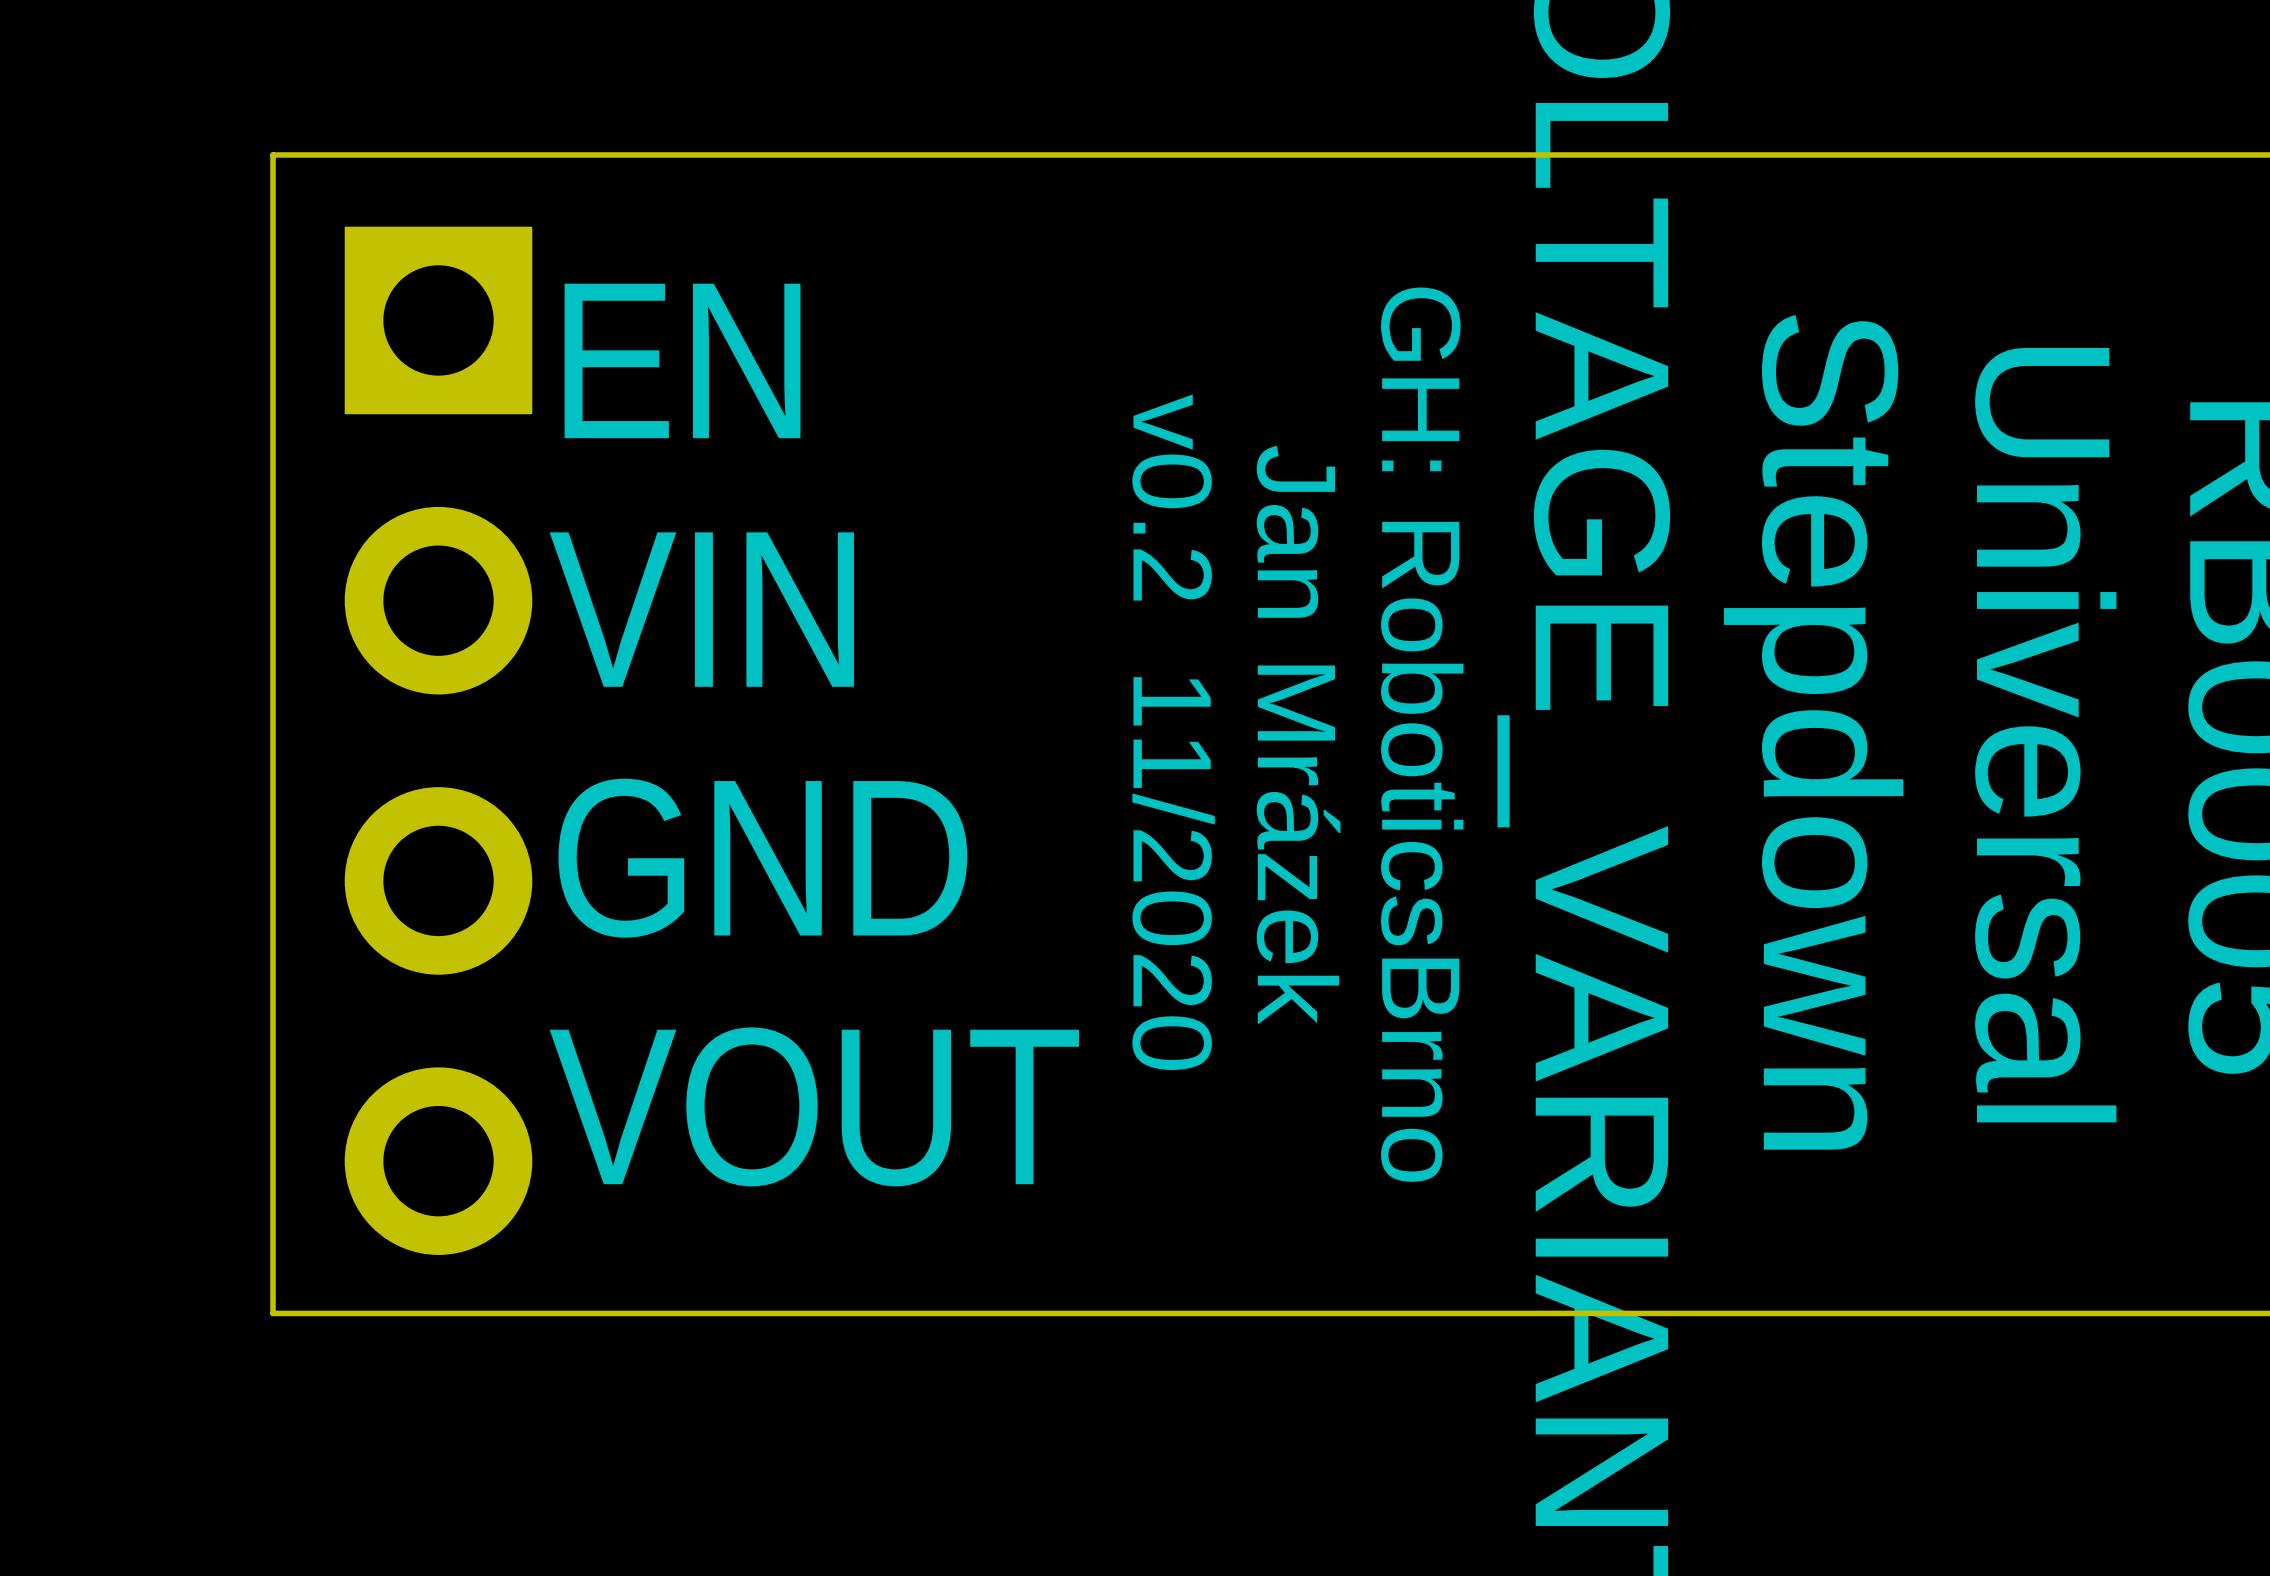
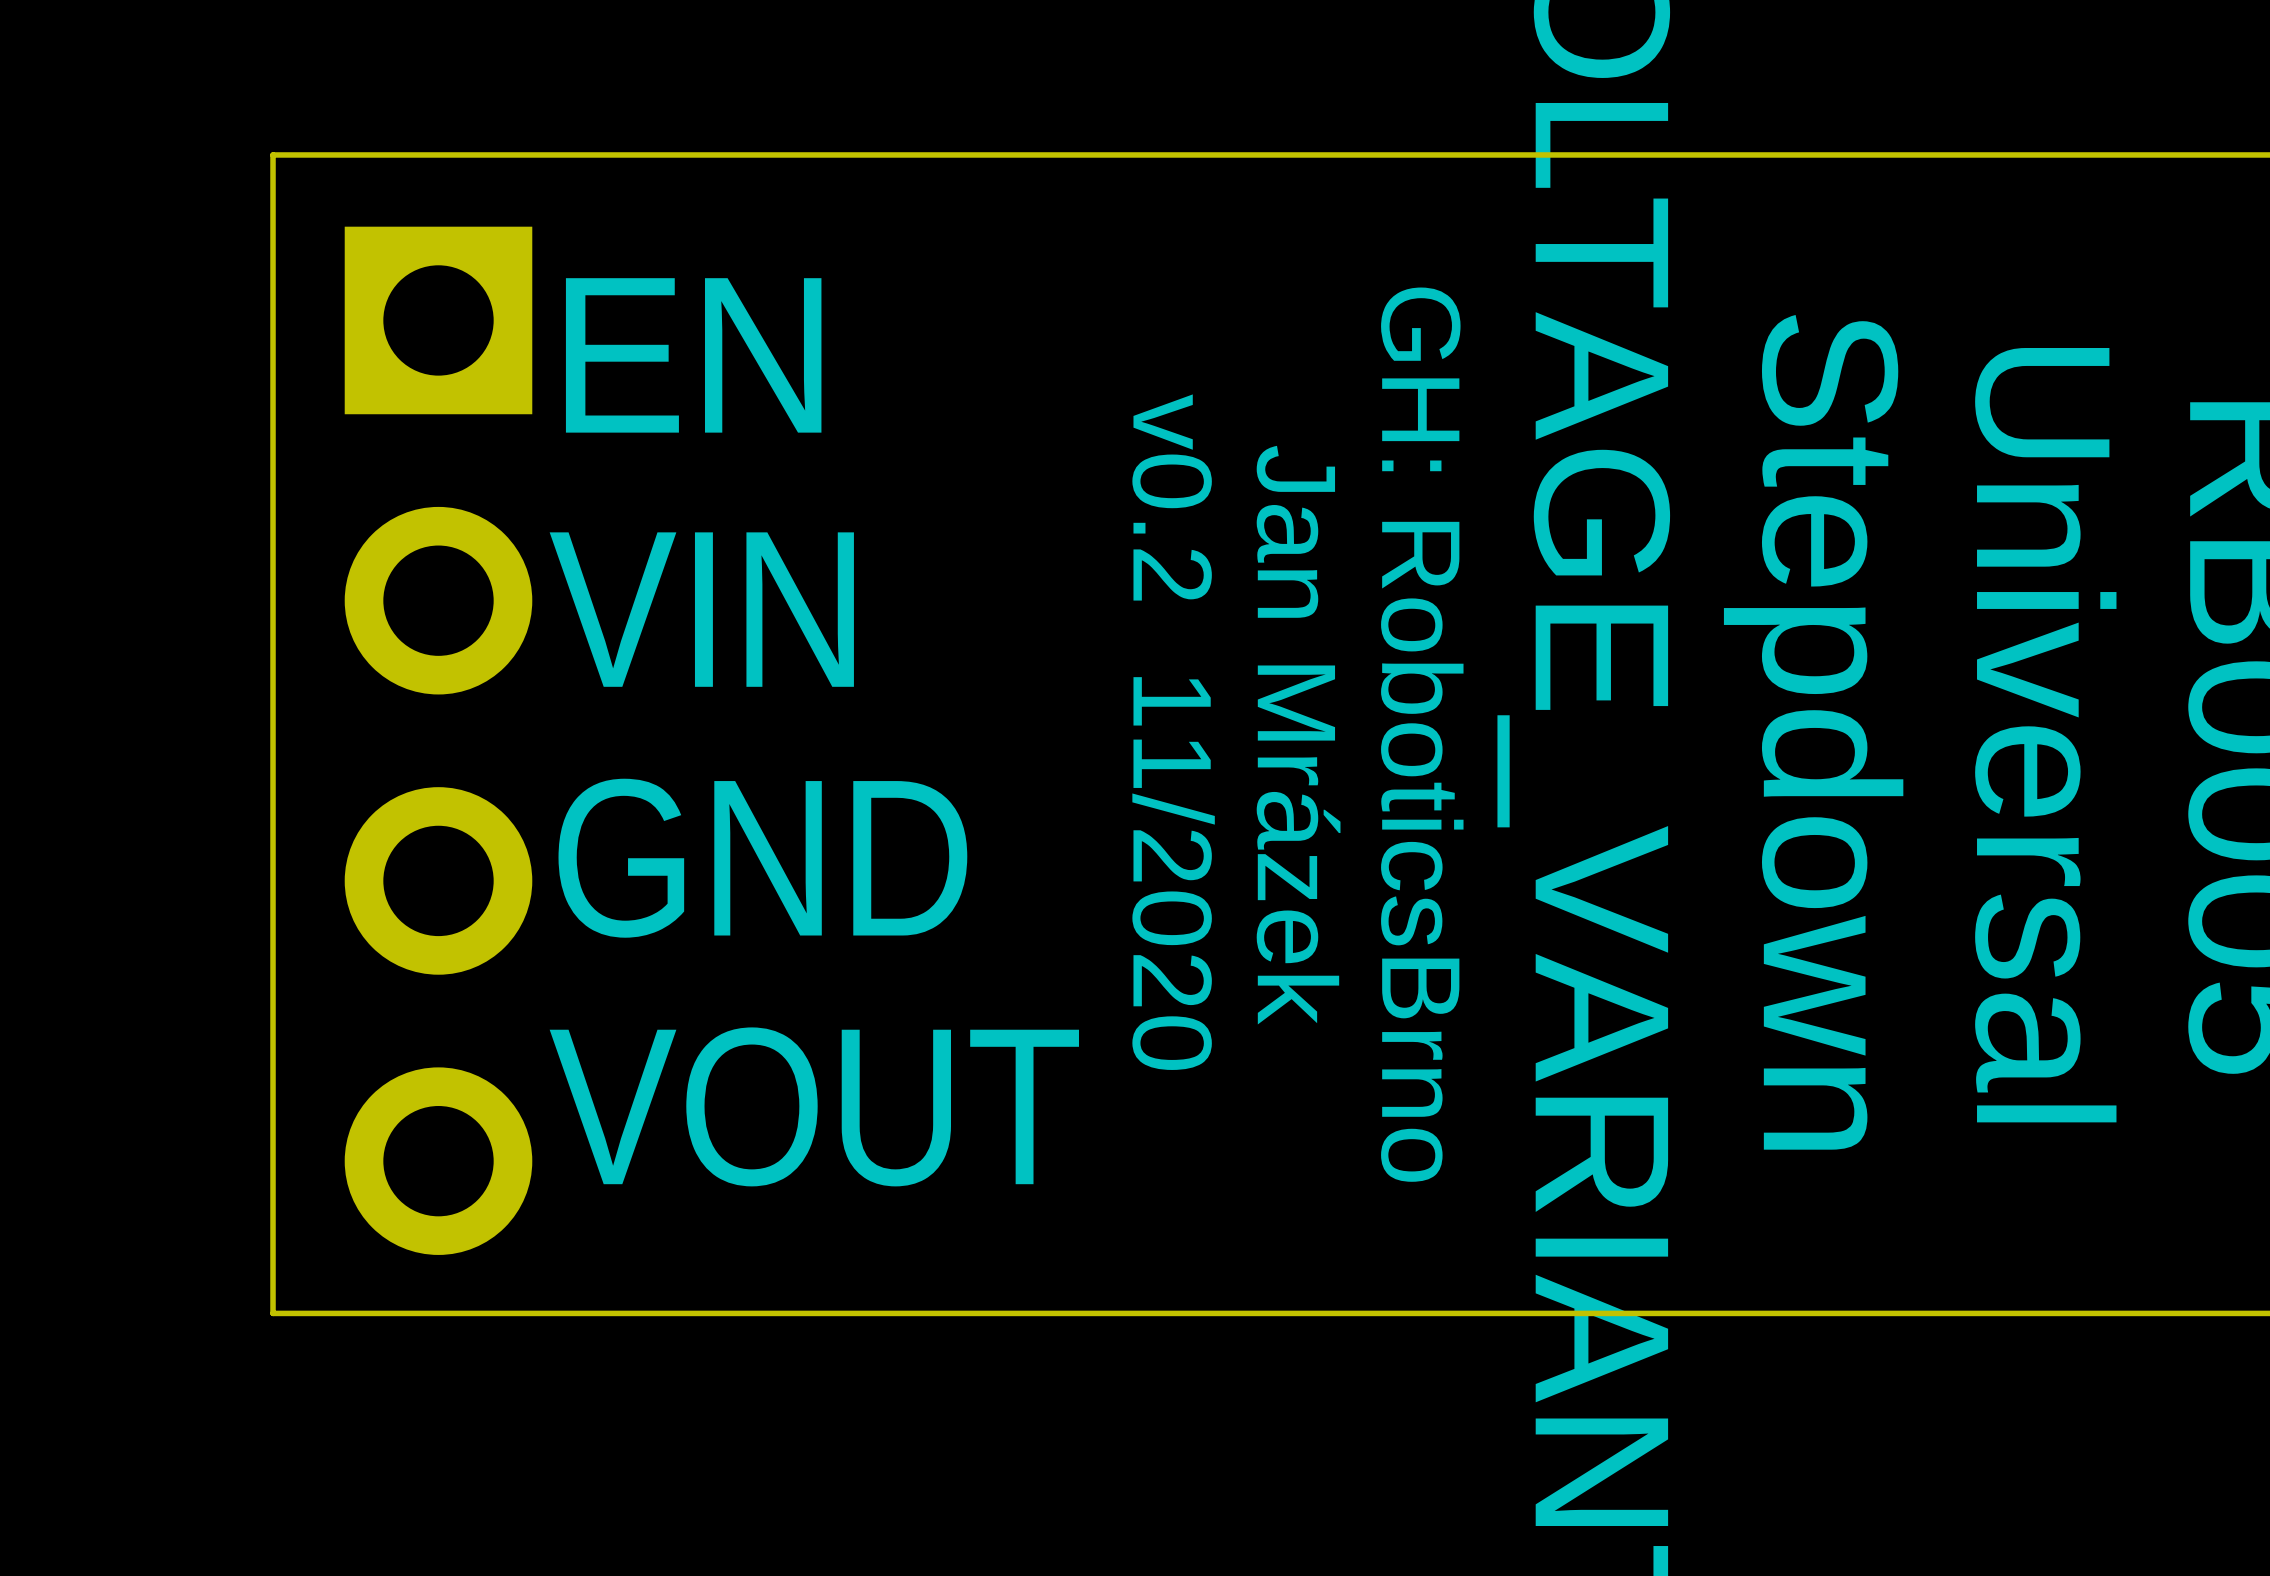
text position: EN (682, 360) -> EN (693, 355)

